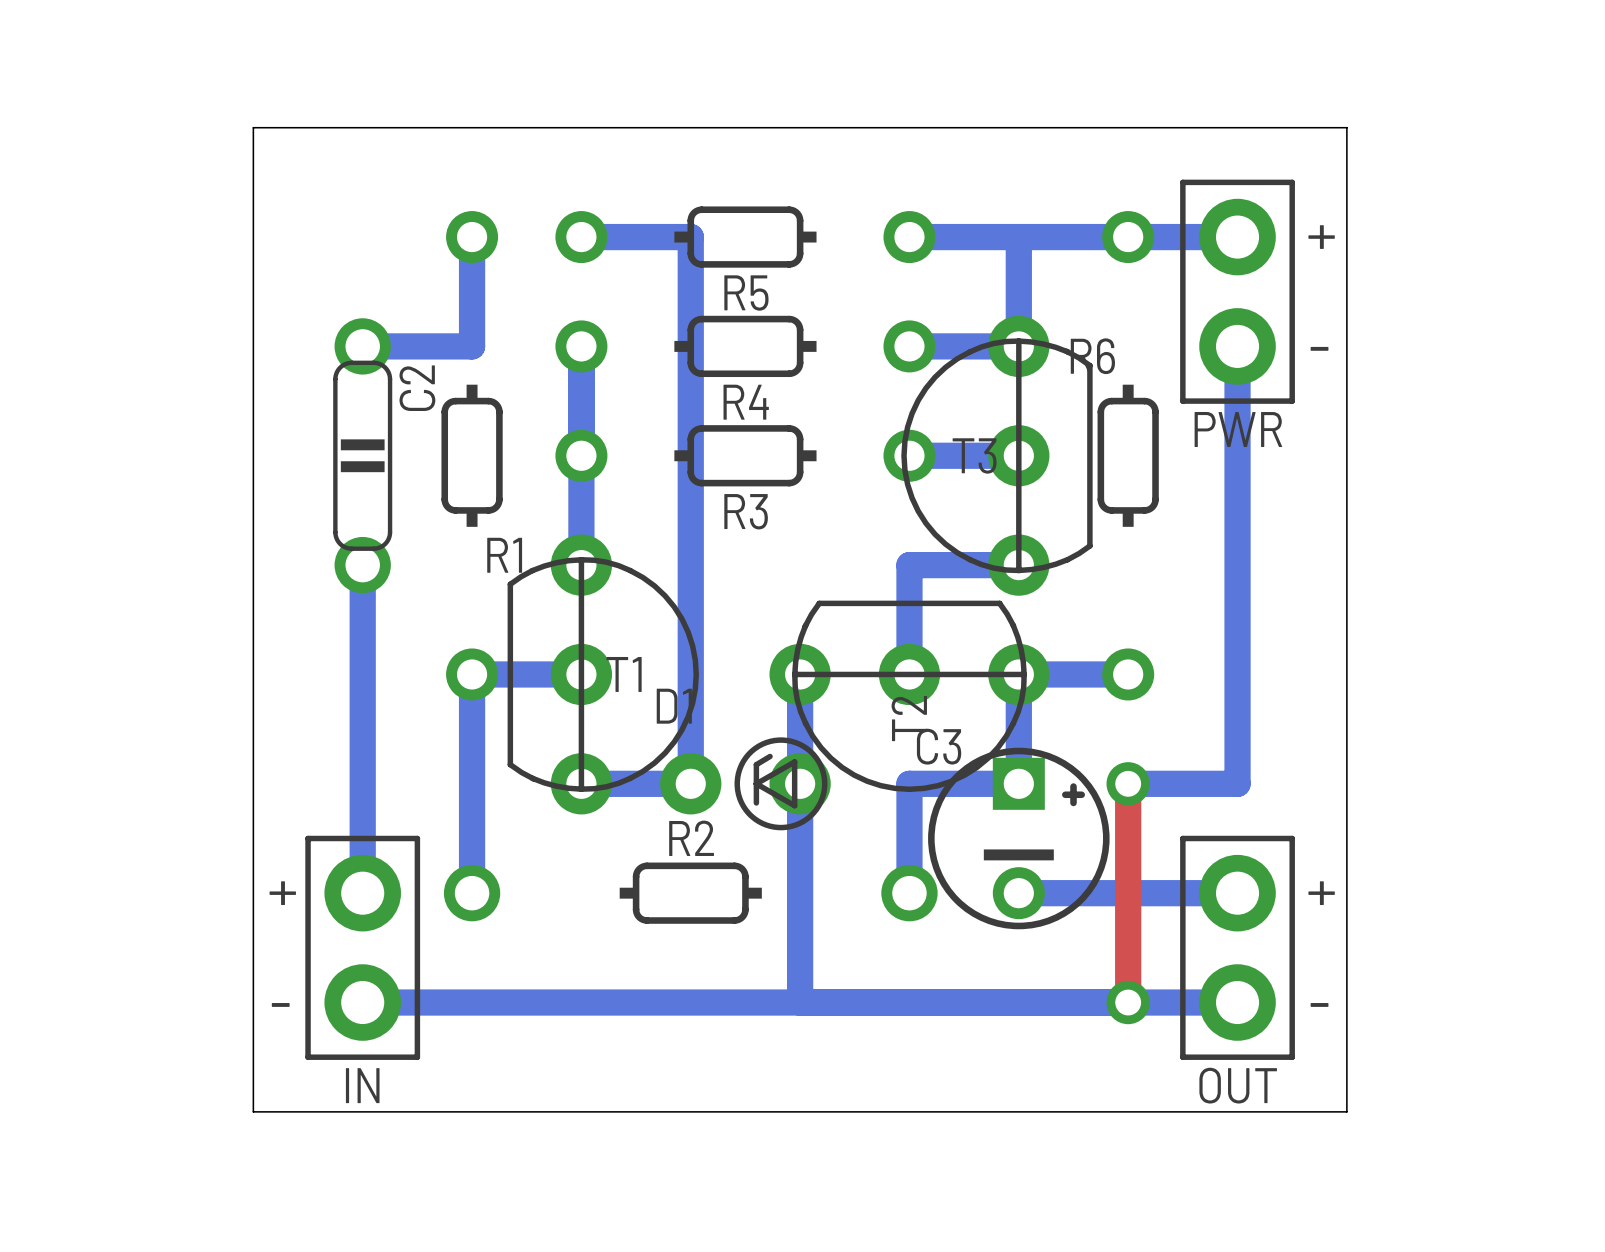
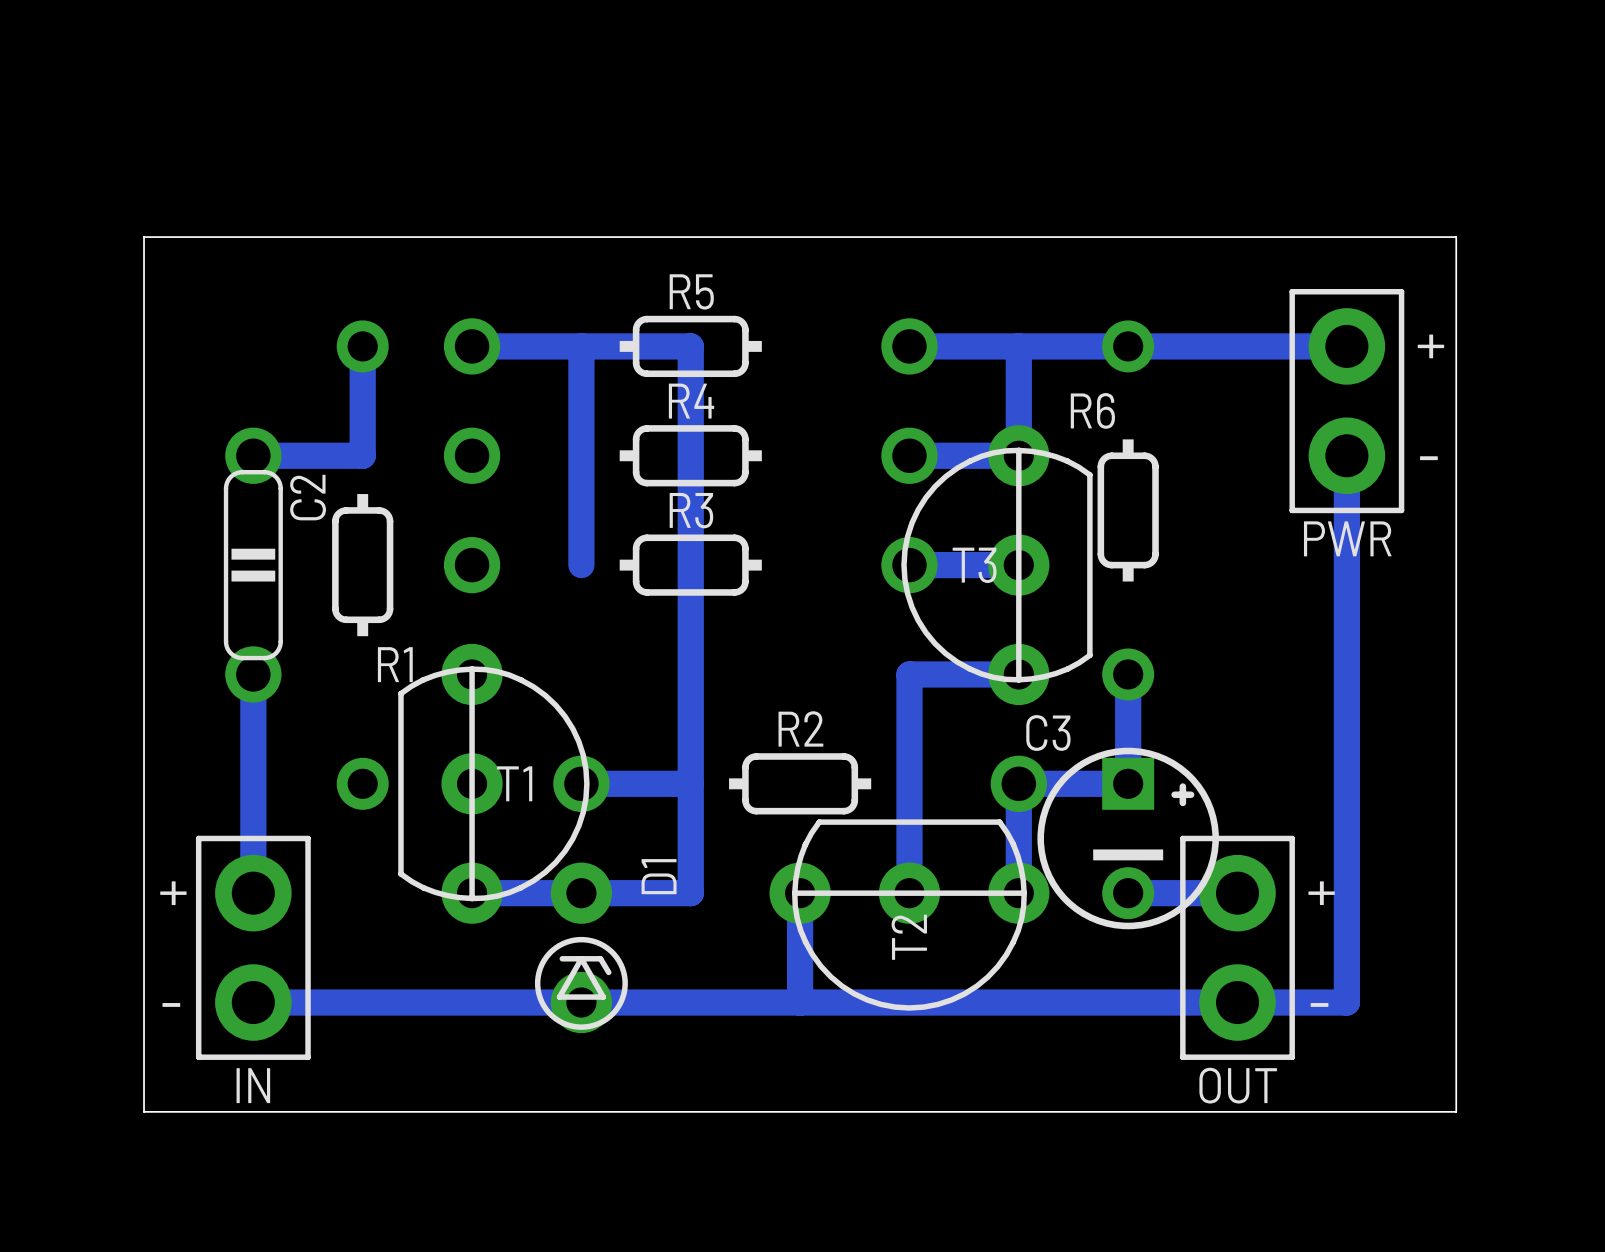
R5 footprint: [555, 206, 936, 268] -> [443, 315, 938, 378]
R6 footprint: [1097, 211, 1159, 701] -> [1097, 320, 1159, 701]
bottom track: (472, 237) (472, 346) (362, 346) -> (253, 455) (362, 455) (362, 346)
bottom track: (581, 237) (690, 237) (690, 346) -> (472, 346) (690, 346)
bottom track: (909, 237) (1237, 237) -> none
bottom track: (1018, 237) (1018, 346) -> none
part position: (1237, 291) -> (1346, 401)
R5 name position: R5 (746, 293) -> R5 (691, 291)
R4 footprint: [555, 315, 936, 378] -> [443, 425, 938, 487]
bottom track: (1237, 346) (1237, 783) (1128, 783) -> none
bottom track: none -> (1346, 346) (1018, 346) (1018, 455)
R4 name position: R4 (746, 402) -> R4 (691, 401)
R3 footprint: [555, 425, 936, 487] -> [443, 534, 938, 596]
C2 position: (362, 455) -> (253, 565)
R1 position: (472, 455) -> (362, 565)
T3 position: (996, 455) -> (996, 565)
bottom track: none -> (1346, 455) (1346, 1002) (1237, 1002)
R3 name position: R3 (746, 511) -> R3 (691, 510)
bottom track: (362, 565) (362, 893) -> none
bottom track: (909, 565) (909, 674) -> none
bottom track: (581, 674) (472, 674) (472, 893) -> (690, 783) (690, 893) (472, 893)
T1 position: (603, 674) -> (493, 783)
bottom track: (800, 674) (800, 893) -> (253, 674) (253, 893)
bottom track: (1128, 674) (1018, 674) (1018, 783) (909, 783) -> (1018, 674) (909, 674) (909, 783)
T2 position: (909, 696) -> (909, 915)
C3 name position: C3 (939, 746) -> C3 (1048, 733)
D1 rotation: 0° (745, 783) -> 90° clockwise (581, 947)
D1 position: (745, 783) -> (581, 947)
top track: (1128, 783) (1128, 1002) -> none
via: (1128, 783) -> none
C3 position: (1018, 838) -> (1128, 838)
R2 position: (690, 893) -> (800, 783)
bottom track: (1018, 893) (1128, 893) -> (1018, 893) (1018, 783) (1128, 783) (1128, 674)
IN position: (362, 947) -> (253, 947)
bottom track: none -> (253, 1002) (362, 1002)
via: (1128, 1002) -> none
board edge: (253, 1111) (253, 127) (1346, 127) (1346, 1111) -> (253, 1111) (144, 1111) (144, 237) (1456, 237) (1456, 1111) (1346, 1111)

